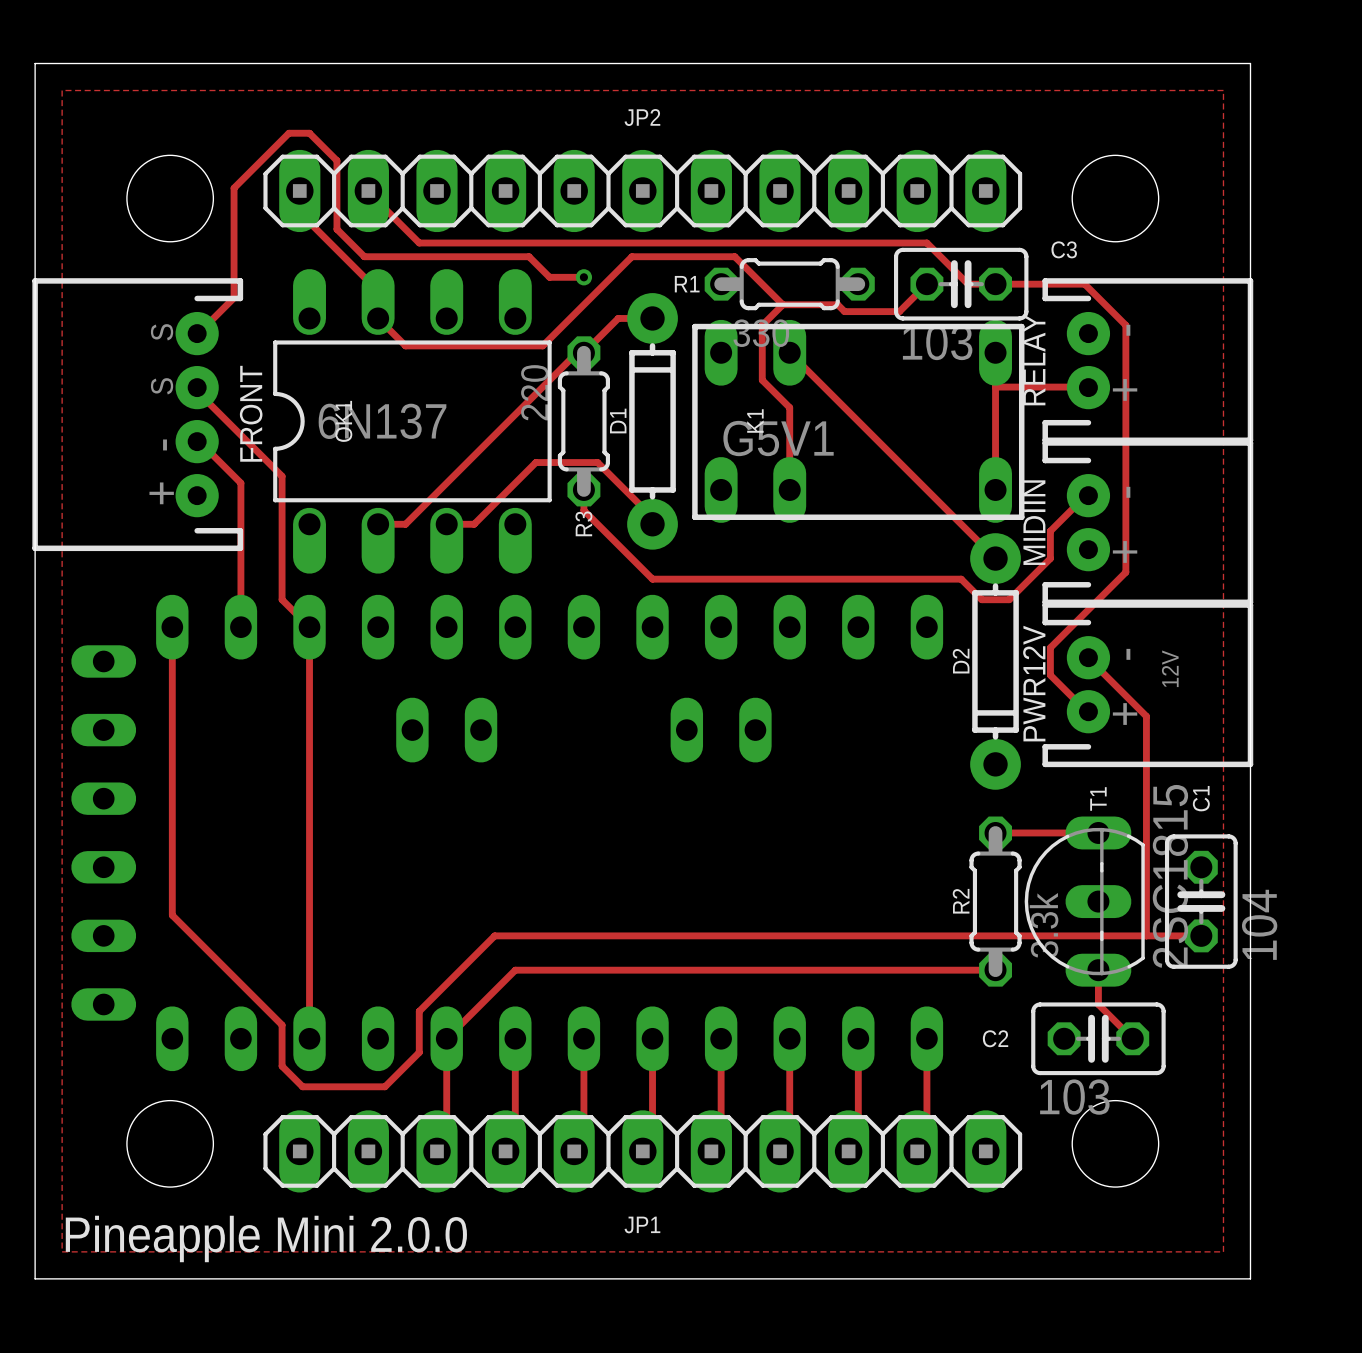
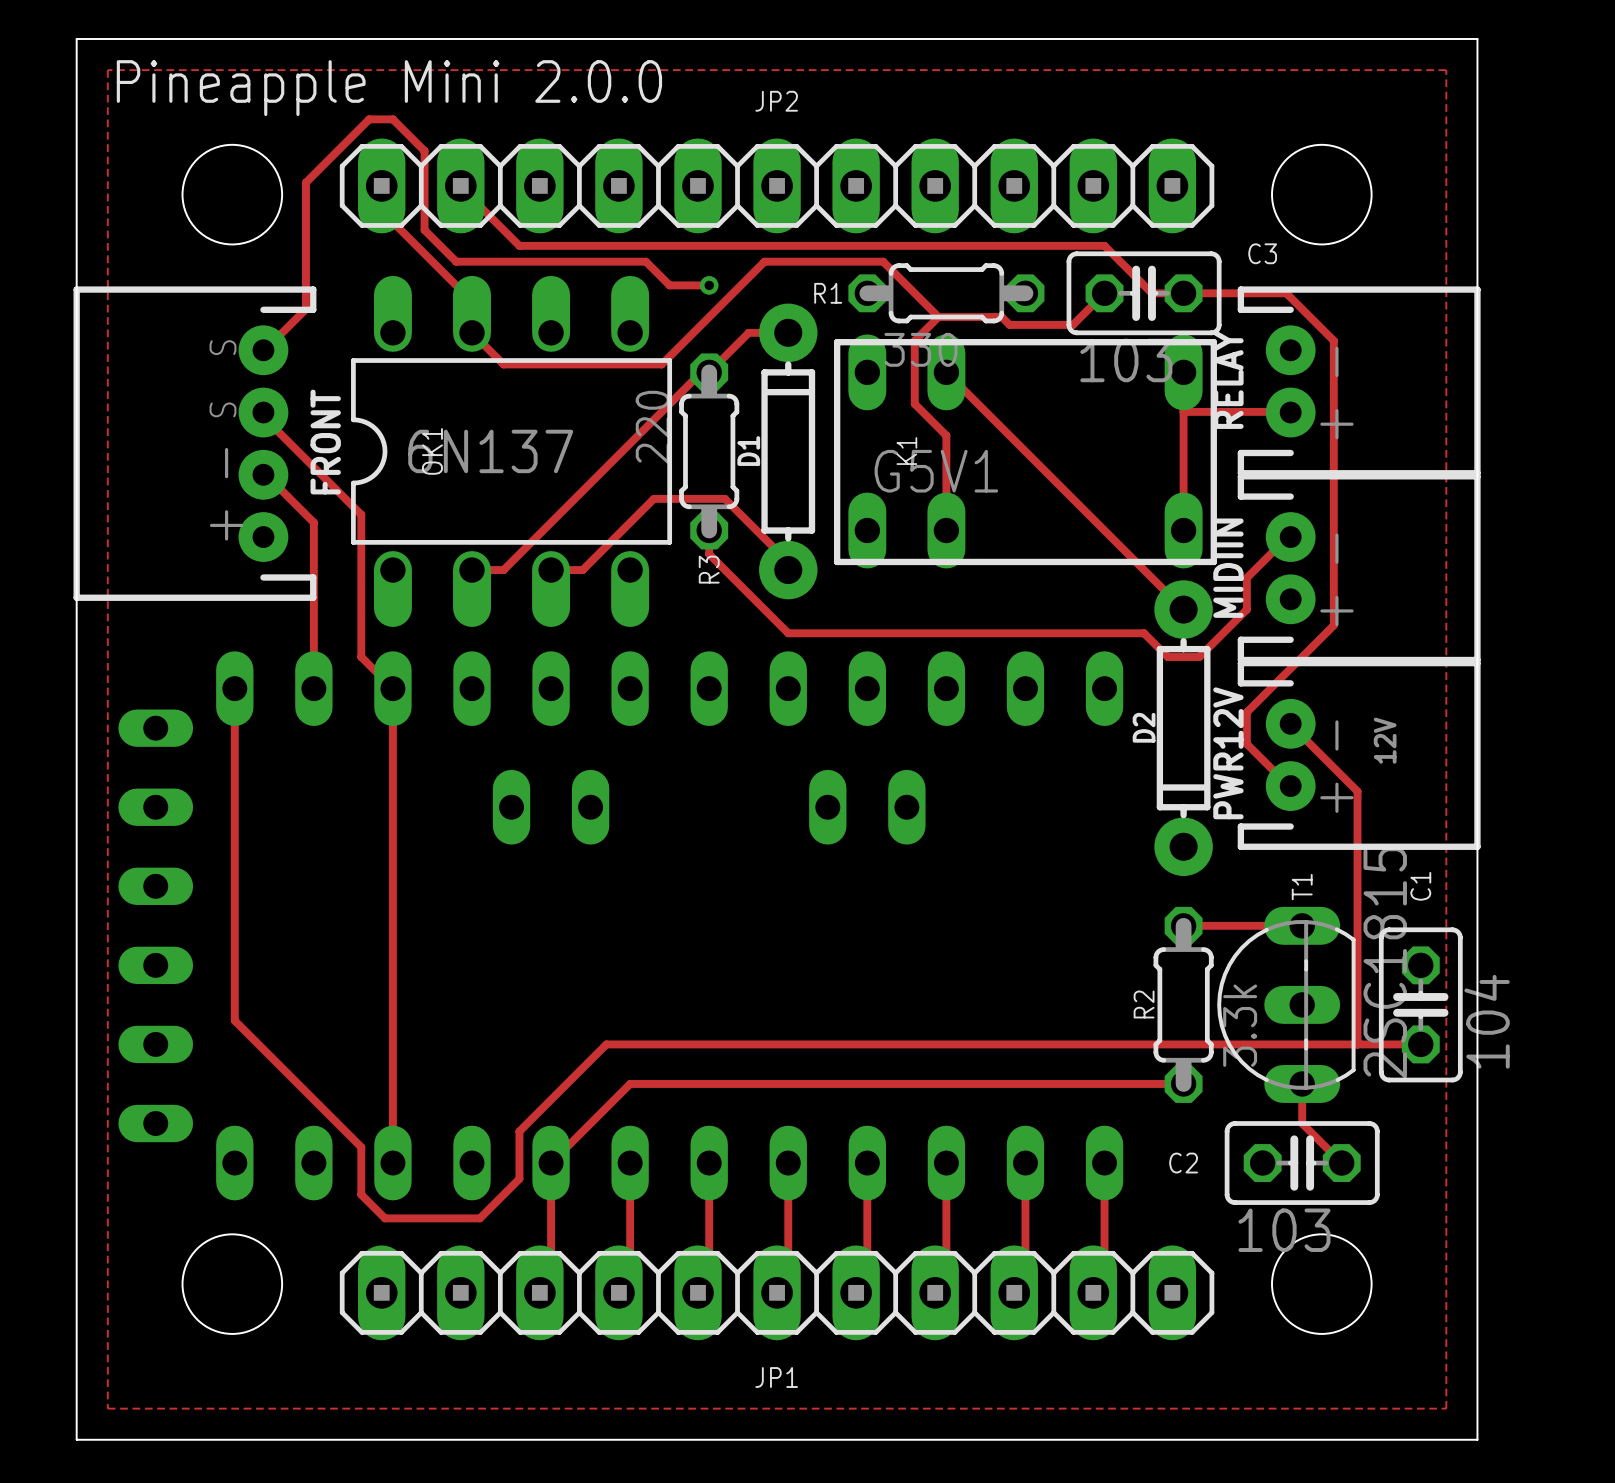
text: none -> Pineapple Mini 2.0.0 (389, 88)
text: Pineapple Mini 2.0.0 (266, 1238) -> none

